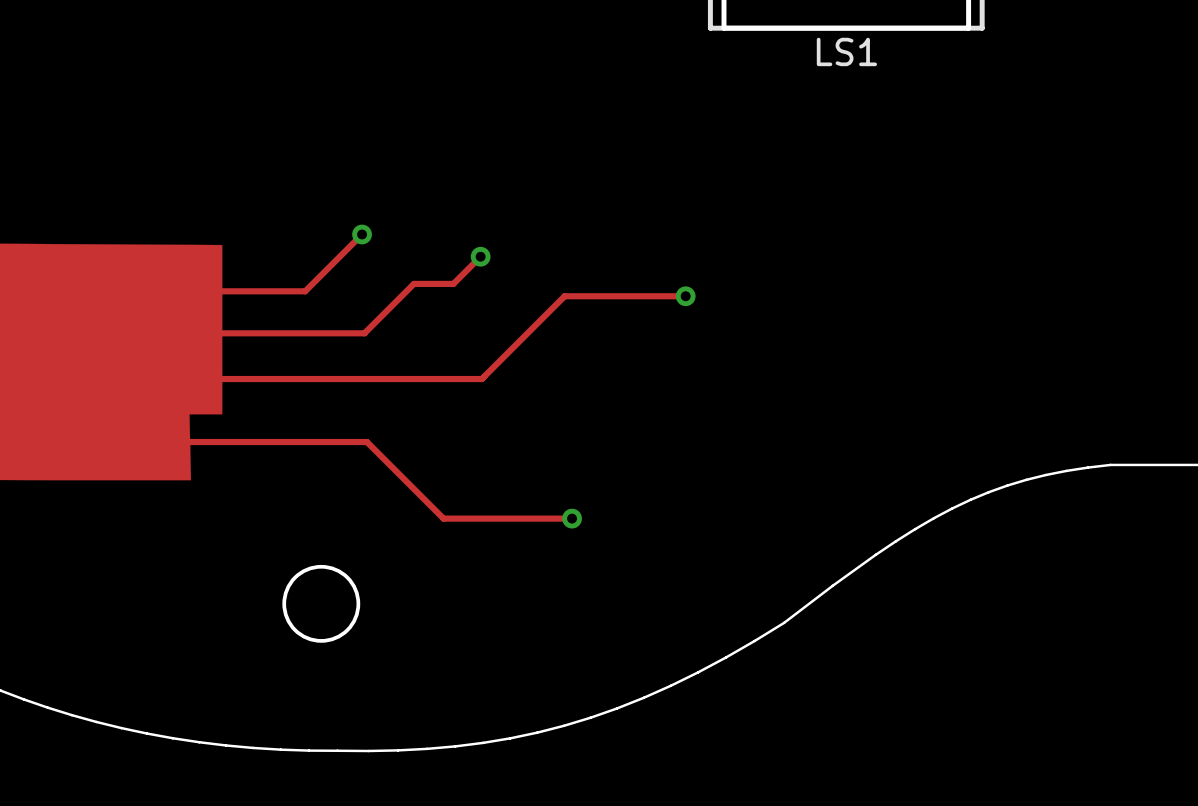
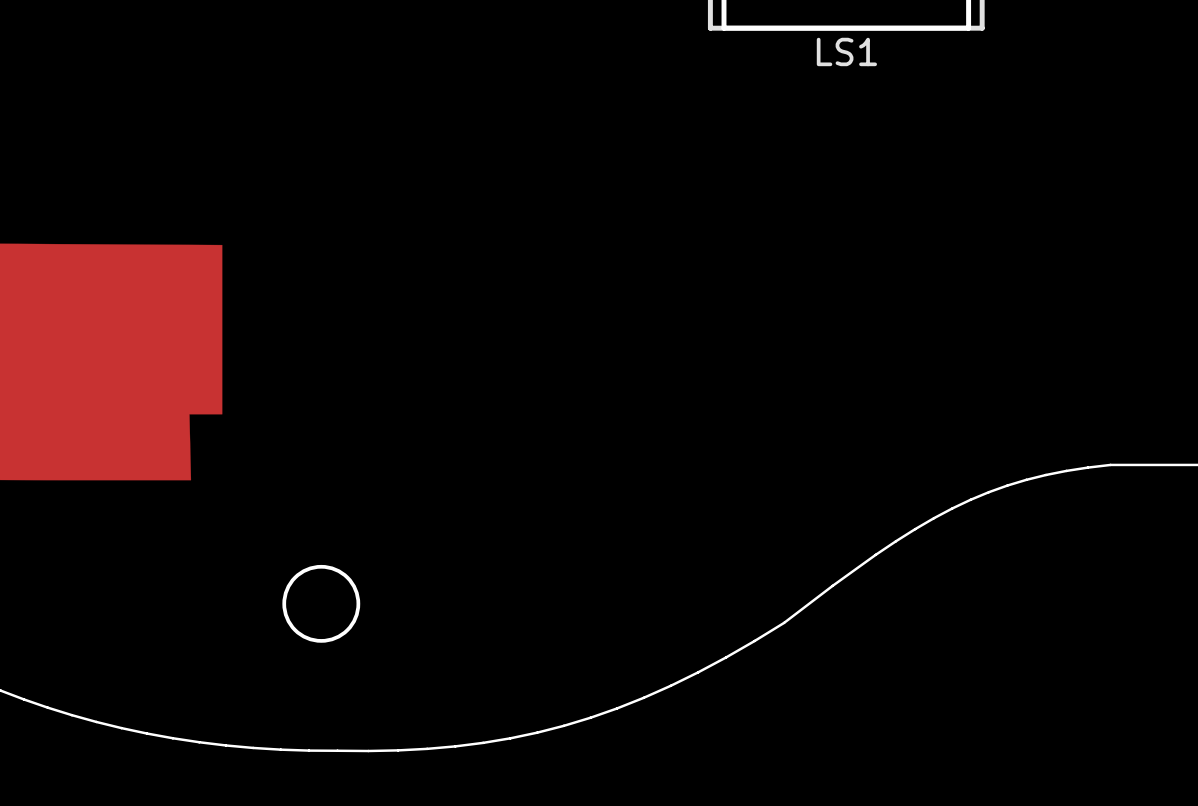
track: (362, 234) (305, 291) (211, 291) -> none
via: (362, 234) -> none
track: (480, 256) (453, 283) (413, 283) (364, 333) (216, 333) -> none
via: (480, 256) -> none
track: (685, 296) (564, 296) (481, 379) (200, 379) -> none
via: (685, 296) -> none
track: (179, 442) (366, 442) (443, 518) (572, 518) -> none
via: (572, 518) -> none

